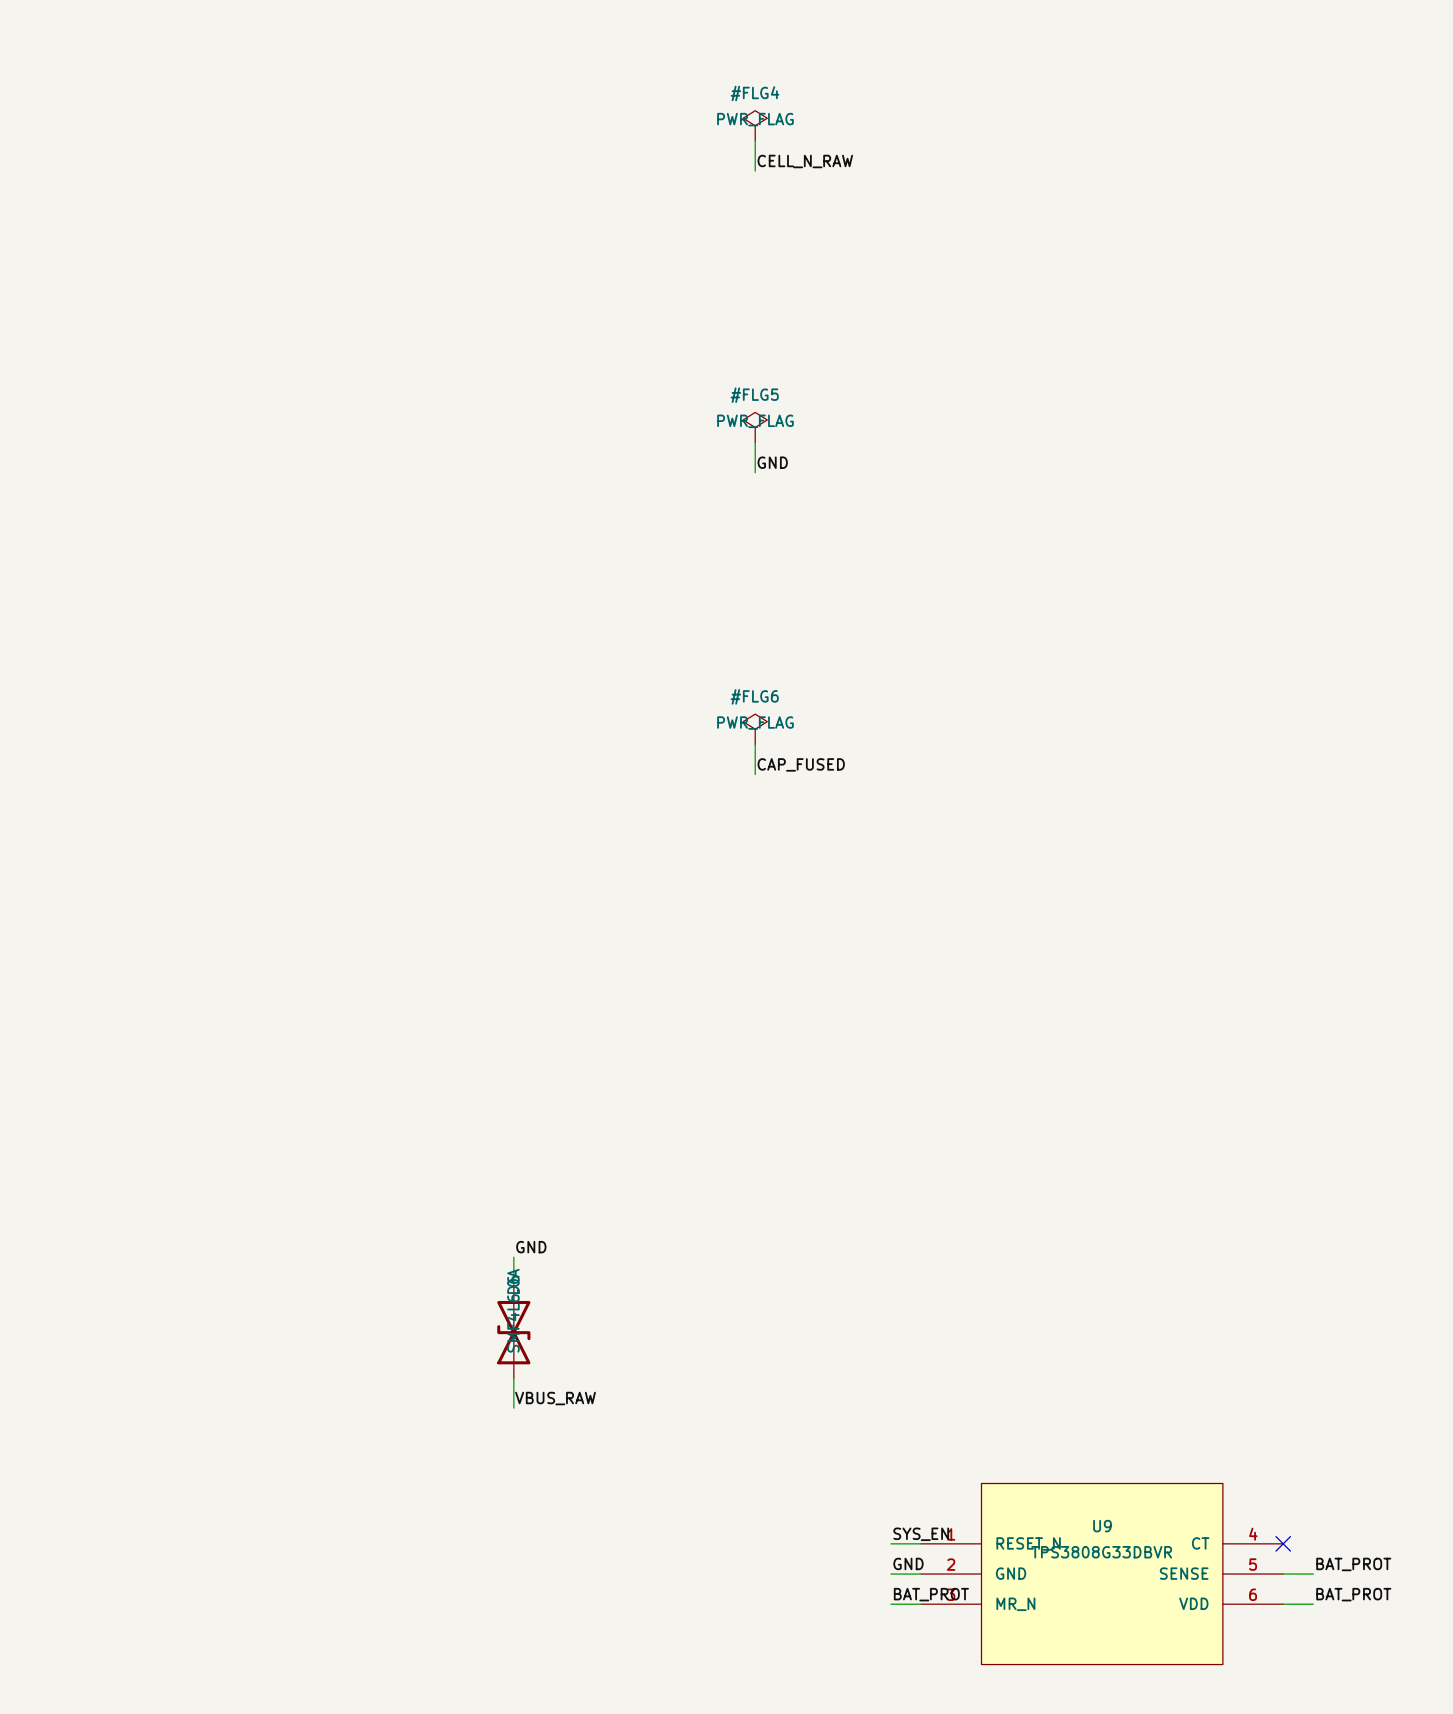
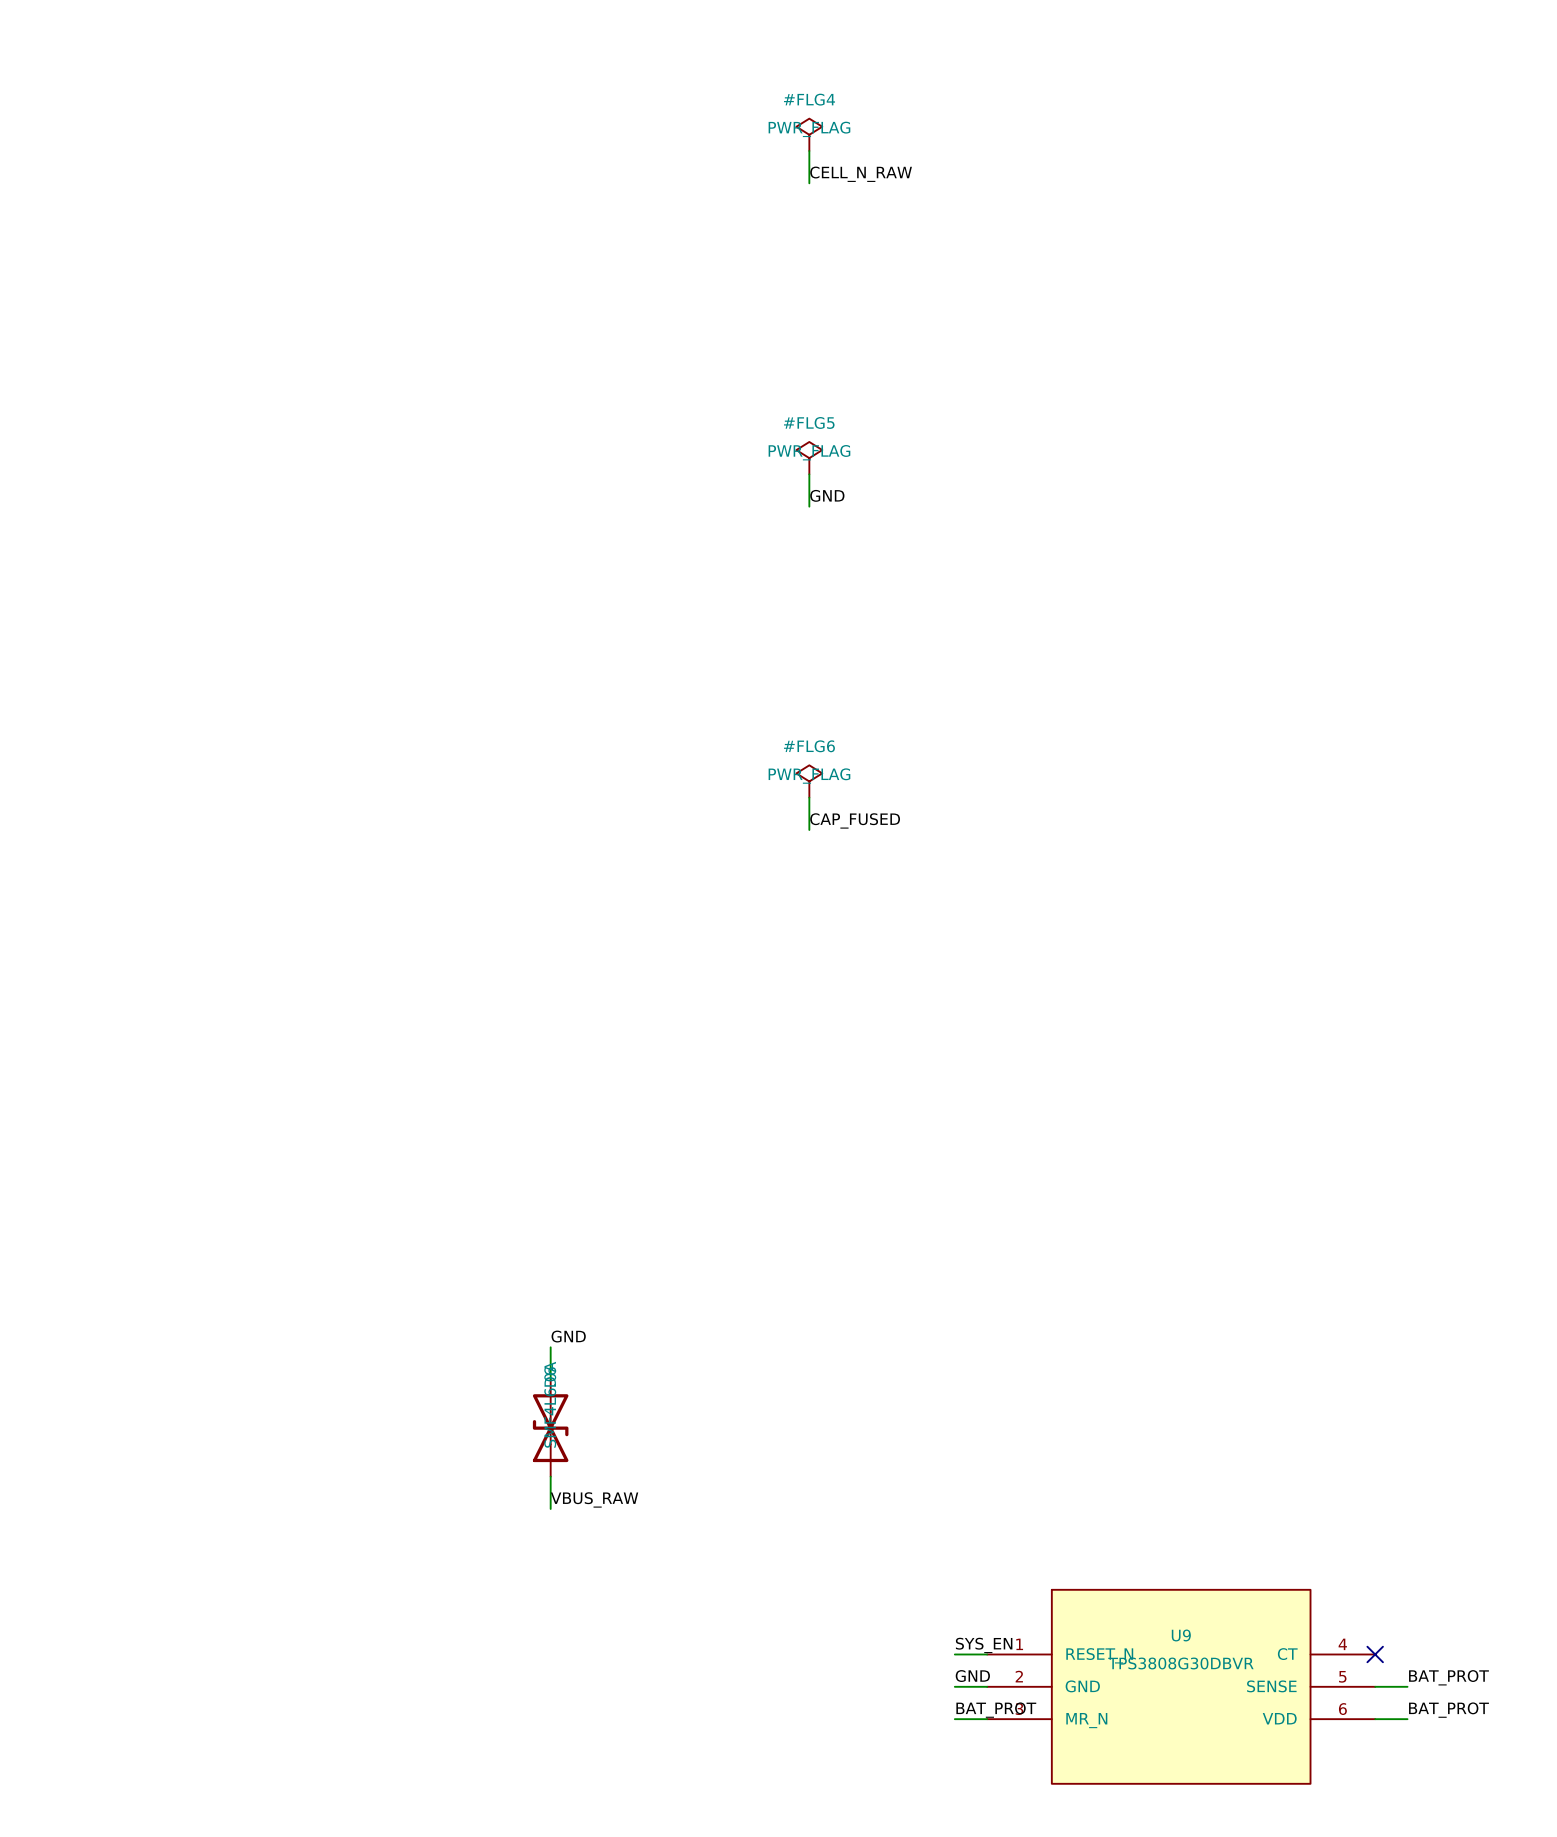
U9 value: TPS3808G33DBVR (1101, 1552) -> TPS3808G30DBVR (1180, 1663)

